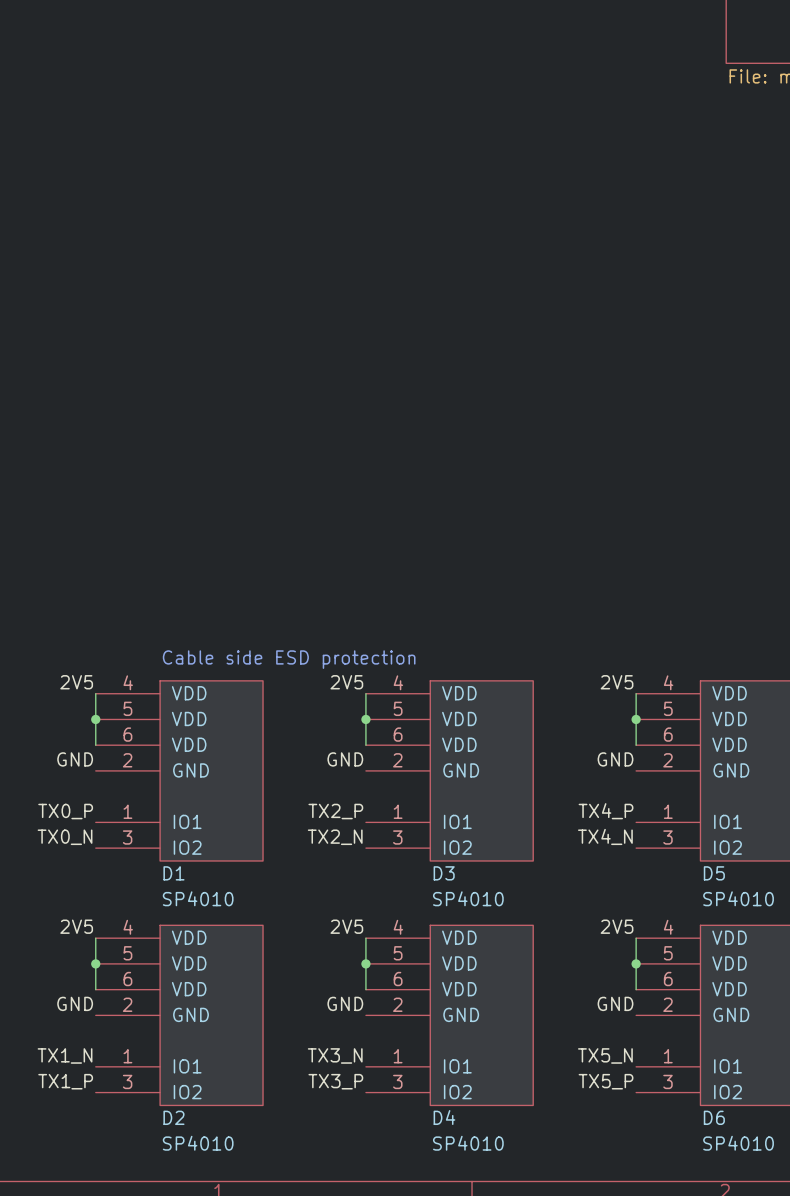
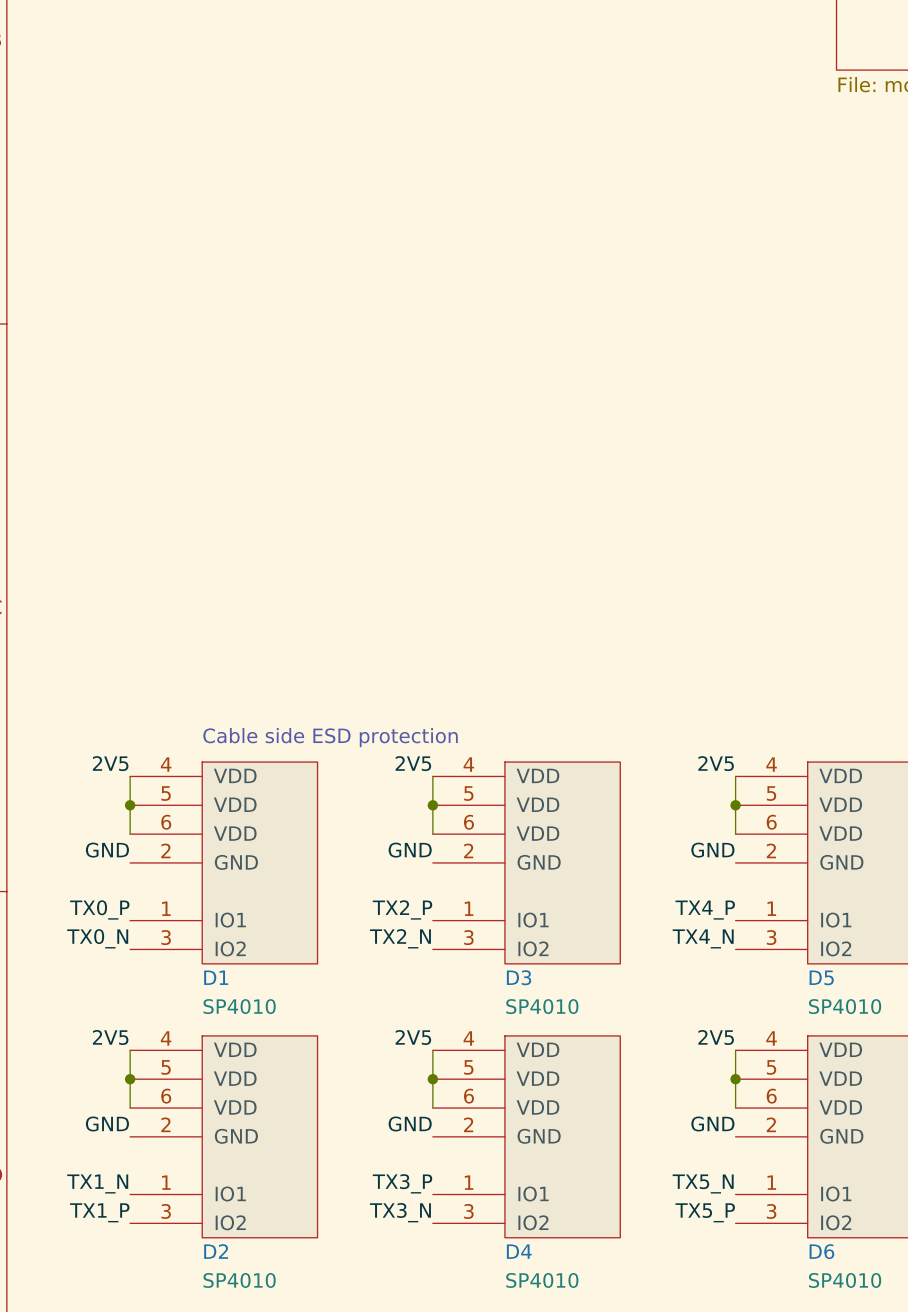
label: TX3_N (335, 1055) -> TX3_P (402, 1183)
label: TX3_P (335, 1081) -> TX3_N (400, 1212)

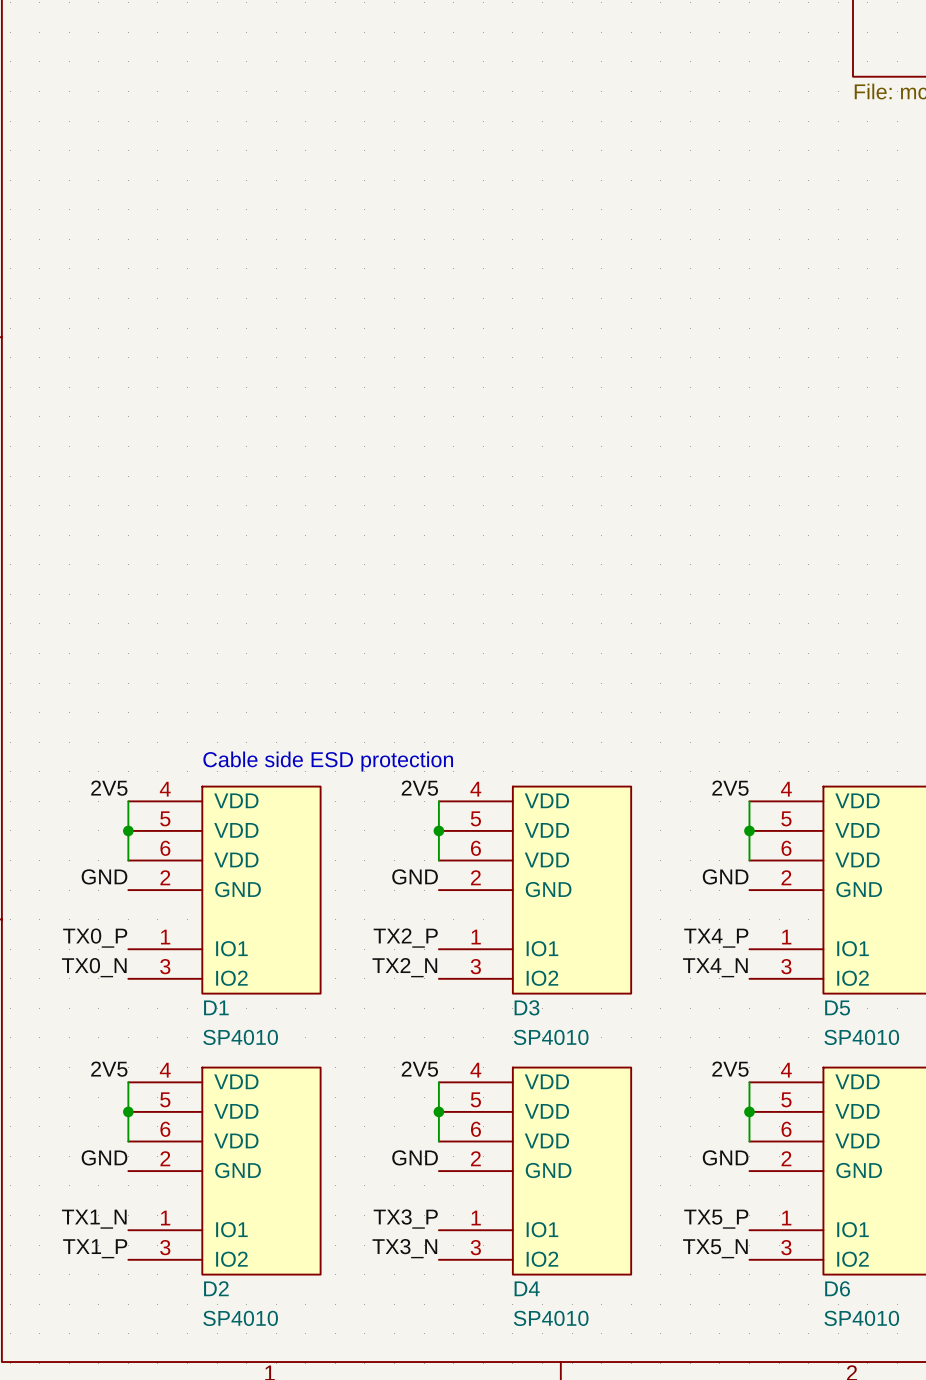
label: TX5_N (703, 1183) -> TX5_P (716, 1219)
label: TX5_P (705, 1212) -> TX5_N (715, 1248)

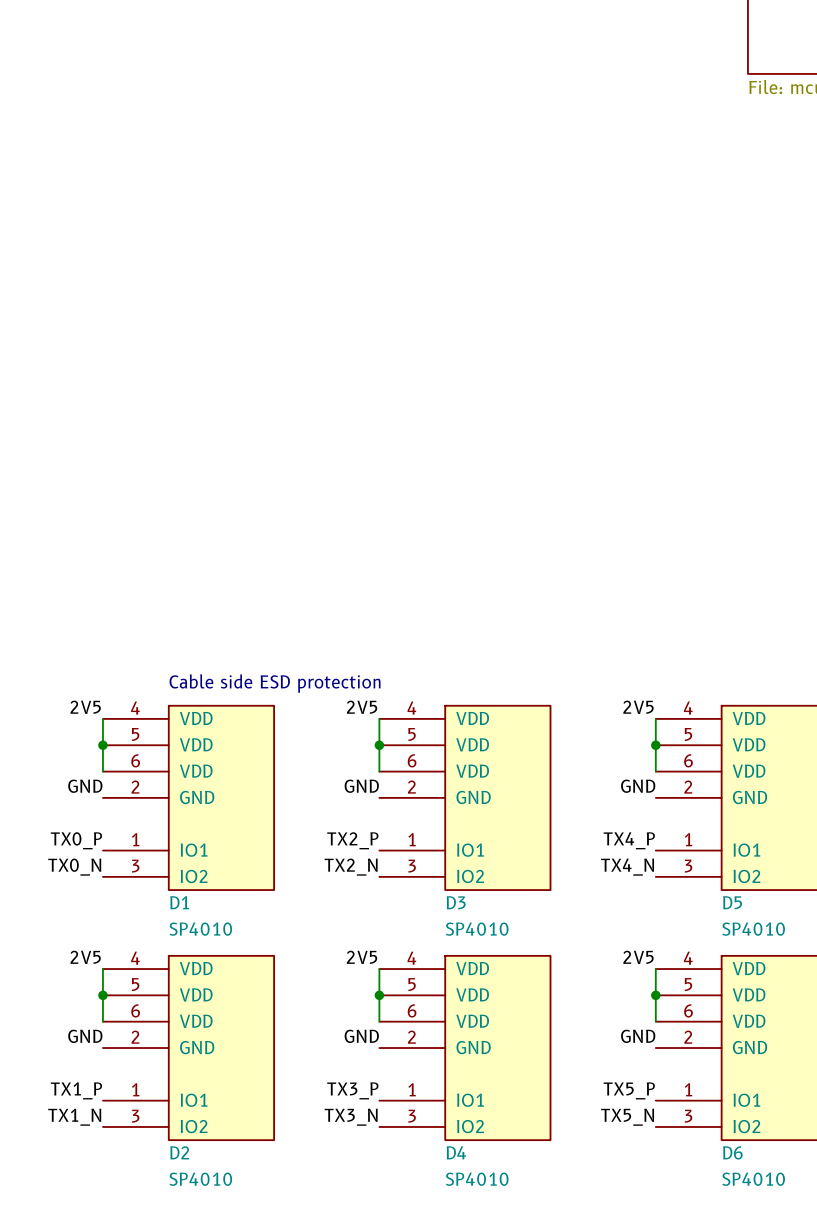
label: TX1_N (94, 1219) -> TX1_P (76, 1090)
label: TX1_P (95, 1248) -> TX1_N (74, 1117)

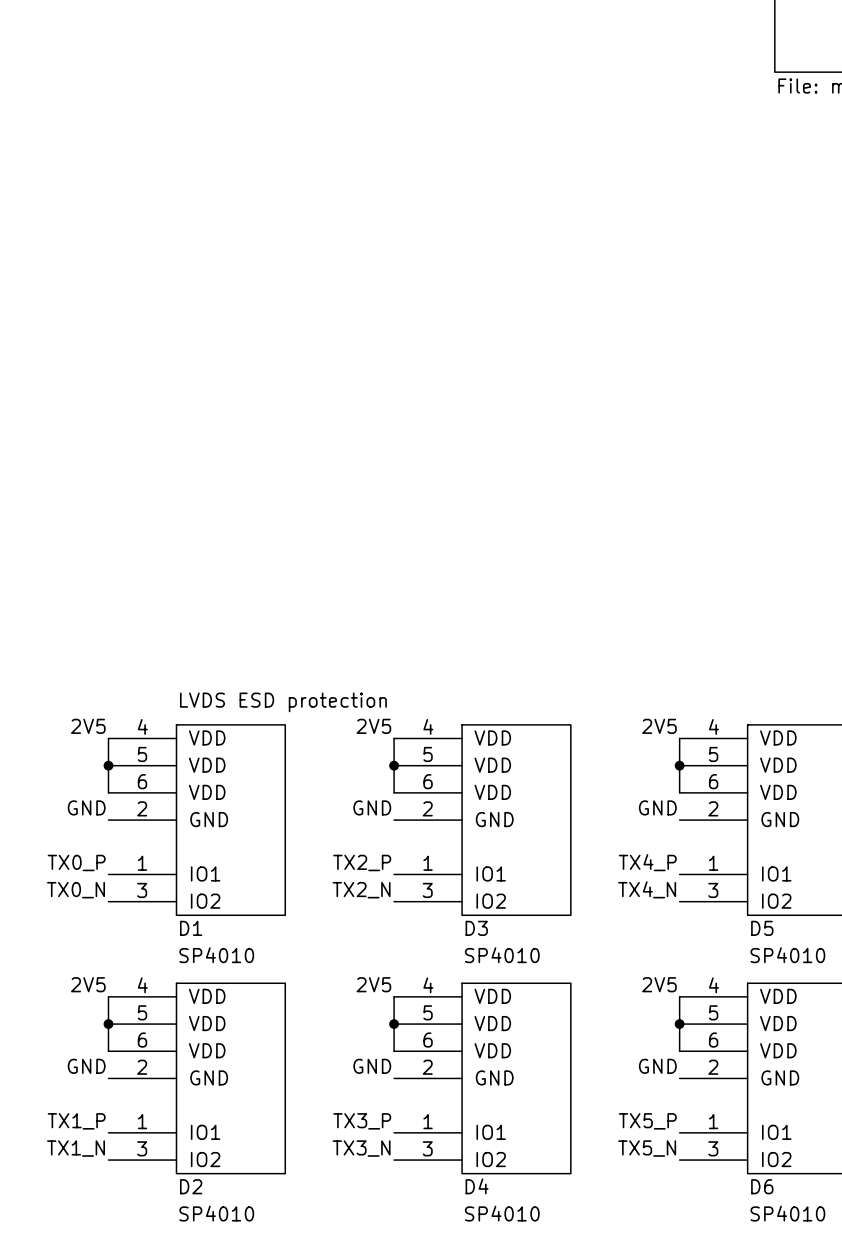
text: Cable side ESD protection (275, 683) -> LVDS ESD protection (283, 702)

